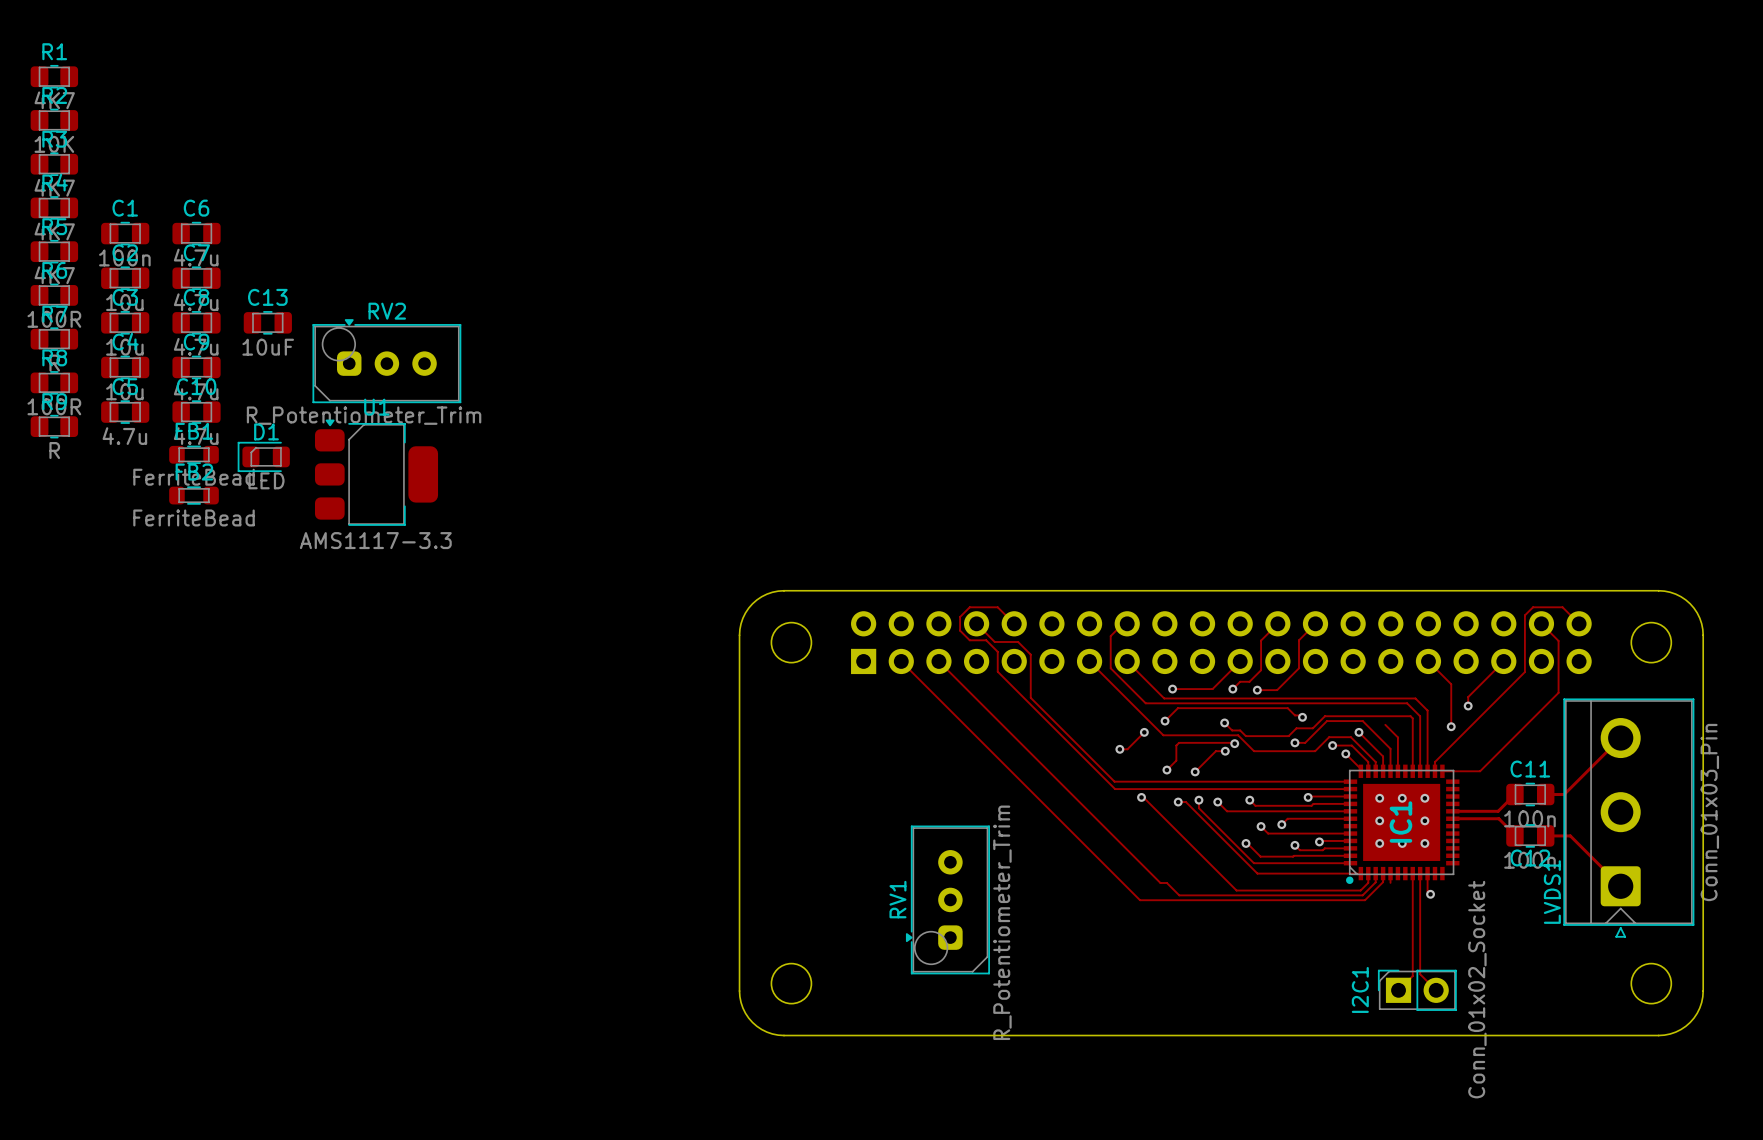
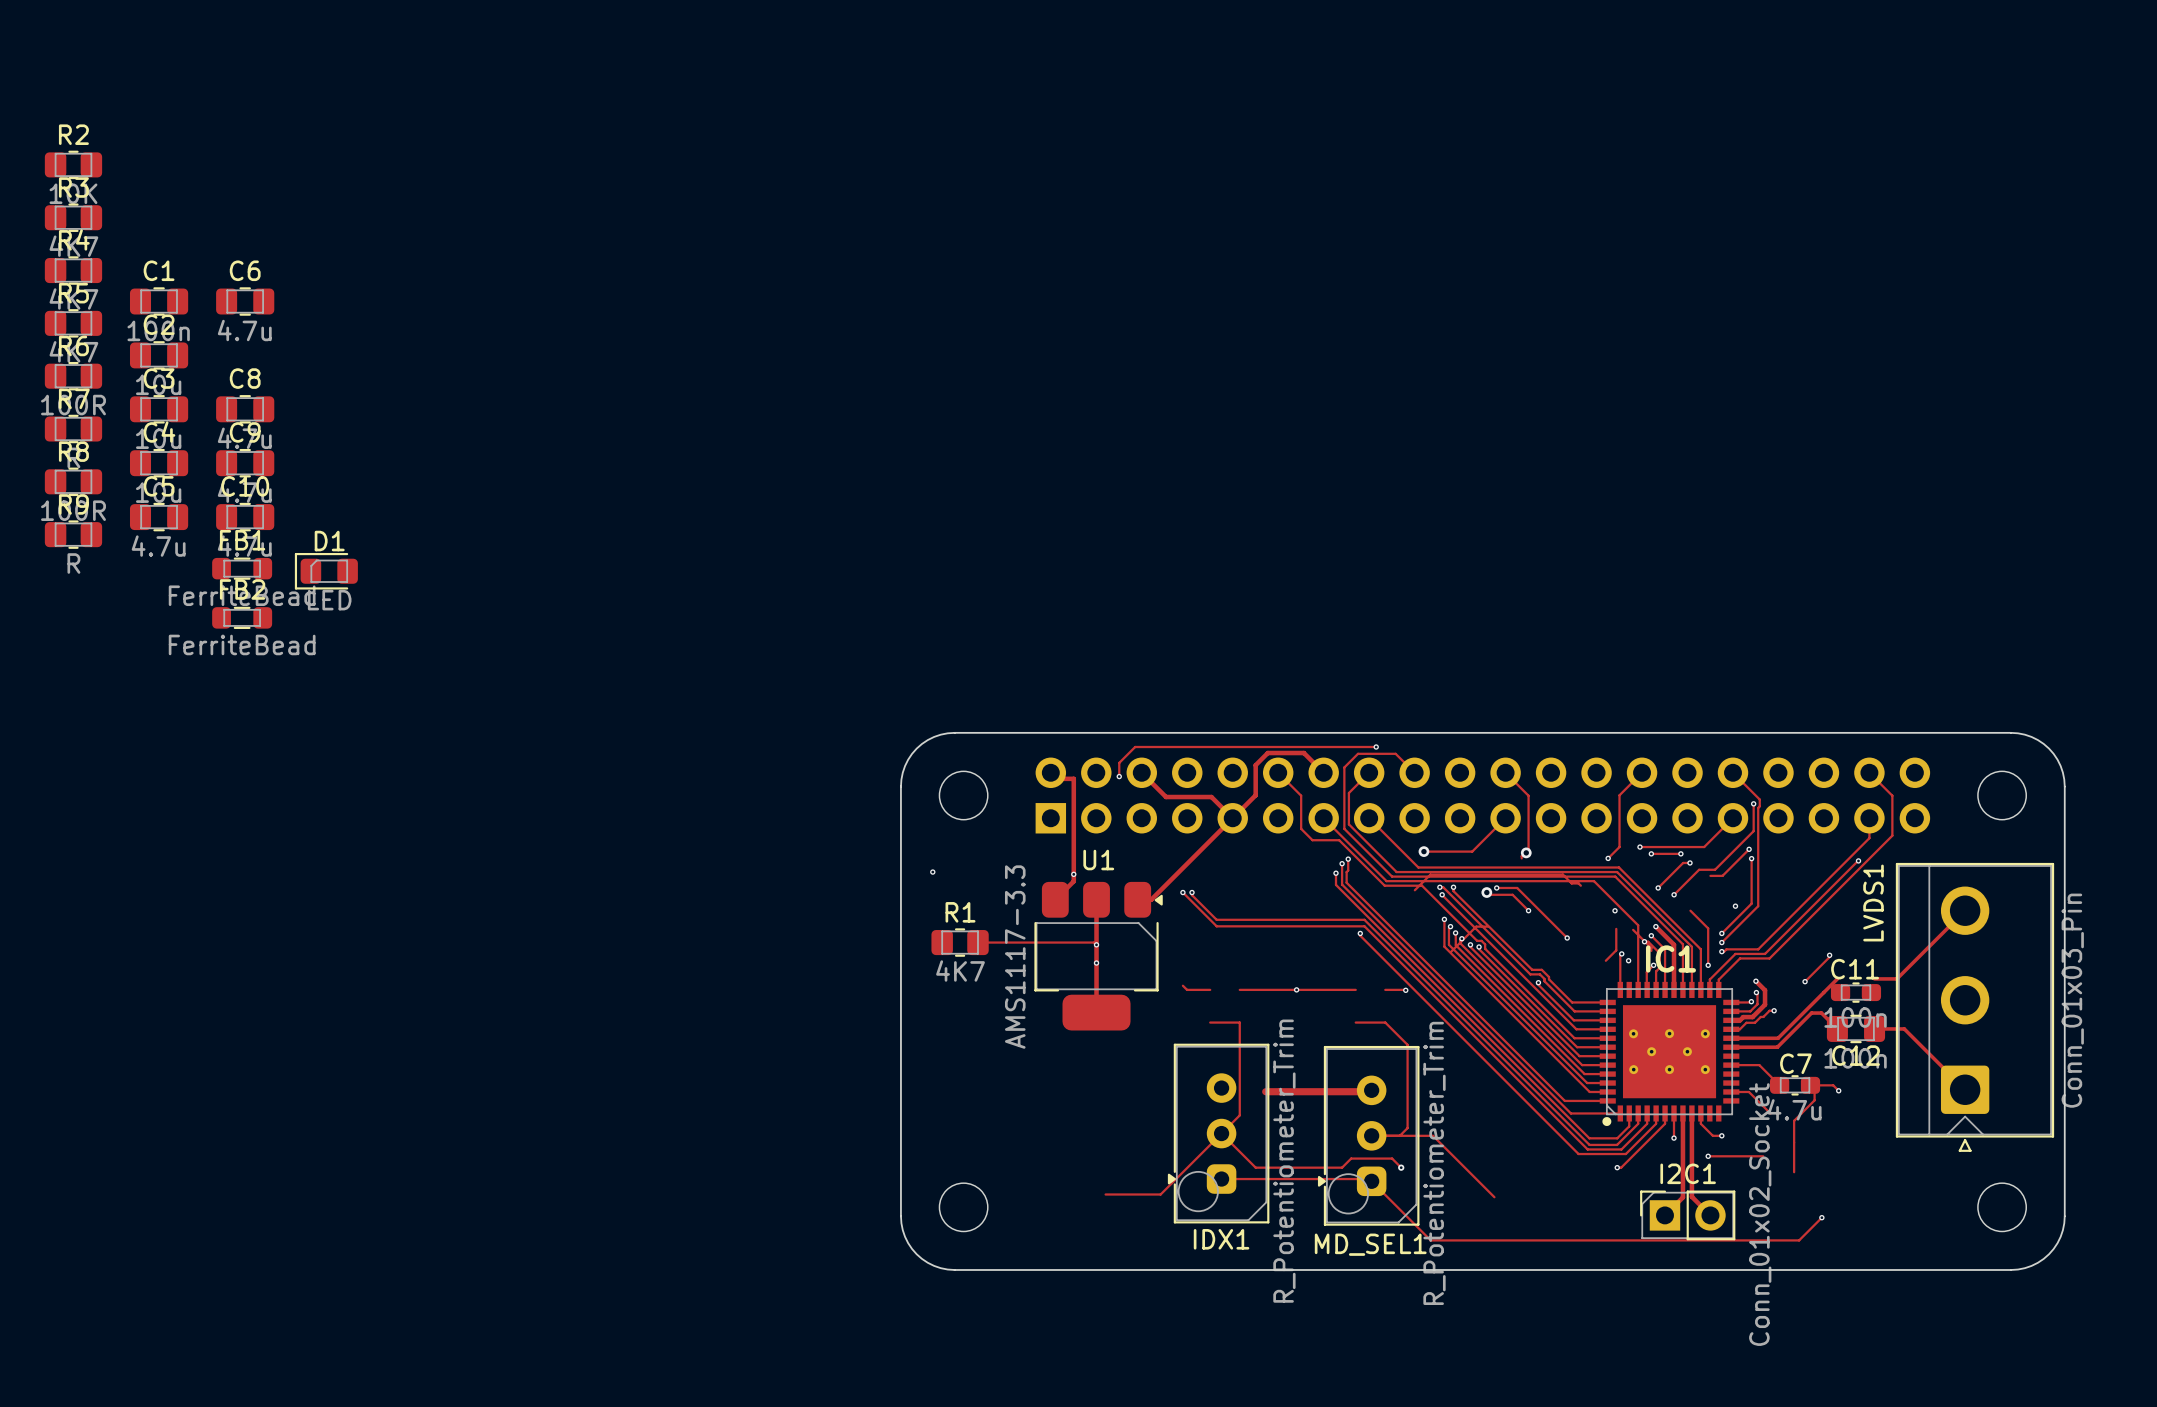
R1 position: (54, 76) -> (960, 942)
C7 footprint: [172, 266, 221, 290] -> [1769, 1075, 1821, 1096]
C13: 10uF (267, 322) -> none
RV2: R_Potentiometer_Trim (386, 361) -> none
U1 rotation: 0° (376, 472) -> 90° clockwise (1098, 956)
U1 position: (376, 472) -> (1098, 956)
track: none -> (1376, 747) (1135, 747) (1119, 762) (1119, 776)
via: none -> (1376, 747)
track: none -> (1050, 772) (1056, 778) (1073, 778) (1073, 881) (1055, 899)
track: none -> (1141, 772) (1166, 797) (1211, 797) (1232, 818)
track: (976, 623) (994, 642) (1018, 642) (1030, 654) (1030, 697) (1114, 781) (1350, 781) -> none
track: (1014, 623) (997, 607) (969, 607) (960, 616) (960, 630) (969, 640) (986, 640) (997, 651) (997, 671) (1115, 789) (1350, 789) -> none
track: none -> (1278, 772) (1301, 795) (1301, 828) (1312, 840) (1339, 840) (1384, 885) (1422, 885) (1477, 940) (1481, 940) (1485, 944) (1485, 948) (1574, 1038) (1607, 1038)
track: none -> (1323, 772) (1303, 753) (1267, 753) (1255, 765) (1255, 795) (1151, 899) (1137, 899)
track: (1127, 623) (1122, 623) (1110, 636) (1110, 668) (1145, 703) (1407, 703) (1420, 716) (1420, 771) -> (1369, 772) (1348, 793) (1348, 824) (1396, 872) (1617, 872) (1649, 903)
track: none -> (1414, 772) (1395, 753) (1358, 753) (1344, 767) (1344, 828) (1392, 876) (1615, 876) (1682, 944) (1682, 989)
track: none -> (1505, 772) (1528, 795) (1528, 849) (1521, 858)
track: (1277, 623) (1261, 640) (1261, 670) (1249, 681) (1240, 681) (1232, 689) -> none
track: (1315, 623) (1298, 640) (1298, 668) (1277, 690) (1257, 690) -> none
track: none -> (1642, 772) (1619, 795) (1619, 847) (1608, 858)
track: none -> (1732, 772) (1759, 799) (1758, 906) (1721, 942)
track: (1579, 623) (1562, 607) (1533, 607) (1524, 615) (1524, 672) (1434, 761) (1434, 771) -> none
via: none -> (1119, 776)
track: (1558, 640) (1558, 692) (1480, 771) (1442, 771) -> (1890, 793) (1892, 795) (1892, 835) (1769, 958) (1740, 958) (1718, 979) (1718, 989)
track: none -> (1753, 803) (1753, 831) (1715, 869) (1699, 869) (1674, 894)
via: none -> (1753, 803)
track: (901, 661) (1140, 900) (1365, 900) (1383, 882) (1383, 873) -> none
track: (938, 661) (1160, 883) (1166, 883) (1179, 895) (1362, 895) (1375, 882) (1375, 873) -> none
track: (1428, 661) (1451, 684) (1451, 726) -> (1732, 818) (1704, 847) (1639, 847)
track: (1503, 661) (1468, 697) (1468, 706) -> none
track: none -> (1869, 818) (1869, 838) (1758, 949) (1726, 949) (1721, 951)
via: none -> (1639, 847)
track: none -> (1749, 849) (1722, 875) (1710, 875)
via: none -> (1749, 849)
via: (1232, 689) -> none
track: none -> (1651, 853) (1680, 853)
via: none -> (1651, 853)
via: none -> (1680, 853)
via: none -> (1608, 858)
track: none -> (1751, 858) (1751, 903) (1721, 933)
via: none -> (1751, 858)
track: none -> (1348, 859) (1346, 882) (1564, 1100) (1607, 1100)
via: none -> (1348, 859)
track: none -> (1858, 860) (1765, 953) (1735, 953) (1709, 979) (1709, 989)
via: none -> (1858, 860)
track: (1164, 698) (1387, 698) -> (1413, 862) (1418, 867) (1619, 867) (1700, 949) (1700, 989)
track: none -> (1683, 862) (1658, 887)
track: (1392, 698) (1415, 698) (1427, 710) (1427, 771) -> none
via: none -> (1689, 862)
track: none -> (1342, 863) (1342, 884) (1570, 1113) (1620, 1113)
via: none -> (1342, 863)
via: none -> (932, 872)
track: none -> (1336, 873) (1336, 884) (1589, 1138) (1617, 1138) (1629, 1126) (1629, 1113)
via: none -> (1336, 873)
via: (1468, 706) -> none
via: none -> (1073, 874)
track: (1141, 713) (1163, 735) (1238, 735) (1254, 751) (1315, 751) (1329, 737) (1350, 737) (1375, 761) (1375, 771) -> (1386, 881) (1594, 881) (1638, 925) (1638, 989)
via: (1302, 717) -> none
track: none -> (1439, 887) (1443, 887) (1530, 974) (1539, 974) (1574, 1011) (1607, 1011)
via: none -> (1439, 887)
track: none -> (1453, 887) (1453, 891) (1532, 969) (1541, 969) (1572, 1002) (1607, 1002)
via: none -> (1453, 887)
track: none -> (1496, 887) (1517, 887) (1567, 938)
via: none -> (1496, 887)
via: none -> (1658, 887)
via: (1165, 721) -> none
track: none -> (1182, 892) (1216, 926) (1364, 926) (1587, 1149) (1621, 1149) (1647, 1123) (1647, 1113)
via: none -> (1182, 892)
track: none -> (1192, 892) (1192, 895) (1216, 919) (1364, 919) (1589, 1144) (1617, 1144) (1638, 1123) (1638, 1113)
via: none -> (1192, 892)
track: (1224, 722) (1232, 730) (1240, 730) (1245, 736) (1288, 736) (1296, 728) (1312, 728) (1324, 716) (1410, 716) (1412, 718) (1412, 771) -> none
via: none -> (1442, 894)
track: none -> (1489, 894) (1512, 894) (1528, 910)
via: none -> (1674, 894)
track: (1385, 724) (1397, 737) (1397, 771) -> none
track: none -> (1442, 895) (1576, 1029) (1607, 1029)
via: (1451, 726) -> none
track: none -> (1096, 899) (1096, 1012)
track: (1144, 732) (1127, 749) (1119, 749) -> none
via: (1144, 732) -> none
via: (1358, 732) -> none
via: none -> (1735, 906)
via: none -> (1528, 910)
via: none -> (1615, 910)
track: none -> (1690, 910) (1708, 928) (1708, 965)
track: (1294, 742) (1305, 742) (1326, 721) (1362, 721) (1390, 748) (1390, 771) -> none
via: (1294, 742) -> none
track: (1234, 743) (1179, 742) (1176, 745) (1176, 760) (1166, 770) -> none
via: (1234, 743) -> none
track: none -> (1444, 919) (1444, 946) (1589, 1091) (1607, 1091)
via: none -> (1444, 919)
track: (1332, 745) (1351, 745) (1368, 761) (1368, 771) -> none
via: (1332, 745) -> none
via: (1119, 749) -> none
track: none -> (1450, 926) (1448, 944) (1587, 1083) (1607, 1083)
via: none -> (1450, 926)
via: (1225, 751) -> none
track: none -> (1655, 926) (1674, 944) (1674, 989)
via: none -> (1655, 926)
track: none -> (1616, 928) (1616, 950) (1605, 960)
via: (1345, 753) -> none
track: none -> (1360, 933) (1360, 935) (1578, 1154) (1625, 1154) (1656, 1123) (1656, 1113)
via: none -> (1360, 933)
track: none -> (1455, 933) (1455, 945) (1584, 1074) (1607, 1074)
via: none -> (1455, 932)
track: (1383, 756) (1383, 771) -> (1678, 933) (1691, 946) (1691, 989)
via: none -> (1721, 933)
track: none -> (1651, 935) (1665, 949) (1665, 989)
via: none -> (1651, 935)
via: none -> (1567, 938)
track: none -> (1461, 938) (1460, 943) (1582, 1065) (1607, 1065)
via: none -> (1461, 938)
track: none -> (1644, 941) (1648, 941) (1659, 953) (1659, 967) (1656, 971) (1656, 989)
via: none -> (1644, 941)
track: none -> (977, 942) (1094, 942) (1096, 944)
IC1 footprint: [1343, 764, 1460, 884] -> [1599, 981, 1740, 1127]
via: none -> (1721, 942)
via: none -> (1096, 944)
track: none -> (1470, 944) (1470, 947) (1579, 1056) (1607, 1056)
via: none -> (1470, 944)
track: none -> (1479, 946) (1479, 949) (1577, 1047) (1607, 1047)
via: none -> (1479, 946)
via: (1166, 770) -> none
via: (1195, 771) -> none
via: none -> (1721, 951)
track: none -> (1621, 953) (1620, 989)
via: none -> (1621, 953)
track: none -> (1829, 955) (1805, 981)
via: none -> (1829, 955)
via: none -> (1628, 960)
via: none -> (1096, 963)
C11 footprint: [1506, 782, 1555, 807] -> [1830, 982, 1882, 1003]
track: none -> (1653, 965) (1646, 972) (1647, 989)
via: none -> (1653, 965)
via: none -> (1708, 965)
track: (1350, 796) (1310, 796) (1308, 794) (1308, 797) -> none
track: none -> (1755, 981) (1765, 990) (1765, 1004) (1752, 1017) (1731, 1020)
via: none -> (1755, 981)
via: none -> (1805, 981)
track: (1141, 797) (1141, 795) (1236, 890) (1360, 890) (1368, 882) (1368, 873) -> none
via: (1141, 797) -> none
track: none -> (1538, 982) (1537, 984) (1573, 1020) (1607, 1020)
via: none -> (1538, 982)
via: (1308, 797) -> none
via: (1379, 798) -> none
via: (1402, 798) -> none
via: (1424, 798) -> none
track: none -> (1182, 985) (1187, 989) (1210, 989)
track: (1198, 800) (1198, 808) (1253, 863) (1350, 863) -> none
via: (1198, 800) -> none
track: (1249, 800) (1255, 805) (1350, 803) -> none
via: (1249, 800) -> none
track: (1178, 802) (1185, 802) (1257, 873) (1360, 873) -> none
via: (1178, 802) -> none
track: (1217, 802) (1227, 811) (1350, 811) -> none
via: (1217, 802) -> none
track: none -> (1239, 989) (1355, 989)
via: none -> (1296, 989)
track: none -> (1385, 989) (1405, 990)
via: none -> (1405, 990)
track: none -> (1756, 992) (1757, 1004) (1750, 1011) (1731, 1011)
via: none -> (1756, 992)
track: (1452, 811) (1498, 811) -> (1731, 1038) (1778, 1038) (1817, 999)
track: none -> (1751, 1001) (1731, 1002)
via: none -> (1751, 1001)
track: (1350, 818) (1287, 818) (1281, 824) -> none
track: (1452, 818) (1498, 818) (1508, 828) -> none
via: (1379, 820) -> none
via: (1424, 820) -> none
track: none -> (1774, 1010) (1769, 1010) (1754, 1022) (1746, 1022) (1739, 1029) (1731, 1029)
via: none -> (1774, 1010)
IC1 name position: IC1 (1400, 821) -> IC1 (1670, 958)
via: (1281, 824) -> none
track: (1261, 826) (1268, 833) (1350, 833) -> none
via: (1261, 826) -> none
track: none -> (1210, 1022) (1239, 1022) (1239, 1115) (1160, 1194) (1105, 1194)
track: none -> (1355, 1022) (1385, 1022) (1407, 1044) (1407, 1128) (1399, 1135)
track: none -> (1837, 1028) (1821, 1013) (1811, 1013) (1777, 1047) (1731, 1047)
track: (1350, 840) (1319, 841) -> none
via: (1319, 841) -> none
track: (1246, 843) (1260, 856) (1350, 855) -> none
via: (1246, 843) -> none
via: (1379, 843) -> none
via: (1402, 843) -> none
via: (1424, 843) -> none
track: (1294, 845) (1299, 850) (1350, 848) -> none
via: (1294, 845) -> none
track: none -> (1731, 1065) (1759, 1065) (1779, 1085)
track: (1412, 873) (1412, 976) (1398, 990) -> none
track: (1420, 873) (1420, 974) (1436, 990) -> none
track: (1427, 873) (1427, 891) (1430, 894) -> none
track: none -> (1371, 1090) (1265, 1091)
track: none -> (1838, 1090) (1833, 1085) (1810, 1085) (1814, 1089) (1814, 1100) (1794, 1120) (1794, 1172)
via: none -> (1838, 1090)
track: none -> (1731, 1091) (1748, 1091) (1770, 1113)
LVDS1 name position: LVDS1 (1552, 892) -> LVDS1 (1873, 903)
via: (1430, 894) -> none
RV1: R_Potentiometer_Trim (947, 899) -> none
track: none -> (1665, 1113) (1665, 1123) (1621, 1167) (1617, 1167)
track: none -> (1674, 1113) (1674, 1138)
track: none -> (1682, 1113) (1682, 1197) (1664, 1215)
track: none -> (1691, 1113) (1691, 1196) (1710, 1215)
track: none -> (1700, 1113) (1700, 1123) (1712, 1135) (1721, 1135)
IDX1: none -> R_Potentiometer_Trim (1218, 1133)
track: none -> (1221, 1133) (1255, 1167) (1342, 1167) (1351, 1158) (1392, 1158) (1401, 1167)
MD_SEL1: none -> R_Potentiometer_Trim (1368, 1135)
track: none -> (1371, 1135) (1433, 1135) (1494, 1197)
via: none -> (1721, 1135)
via: none -> (1674, 1138)
track: none -> (1708, 1156) (1763, 1156)
via: none -> (1708, 1156)
via: none -> (1401, 1167)
via: none -> (1617, 1167)
track: none -> (1221, 1179) (1369, 1179) (1430, 1240) (1799, 1240) (1821, 1217)
I2C1 name rotation: 0° (1360, 989) -> 90° clockwise (1688, 1173)
I2C1 position: (1417, 990) -> (1687, 1215)
via: none -> (1821, 1217)

